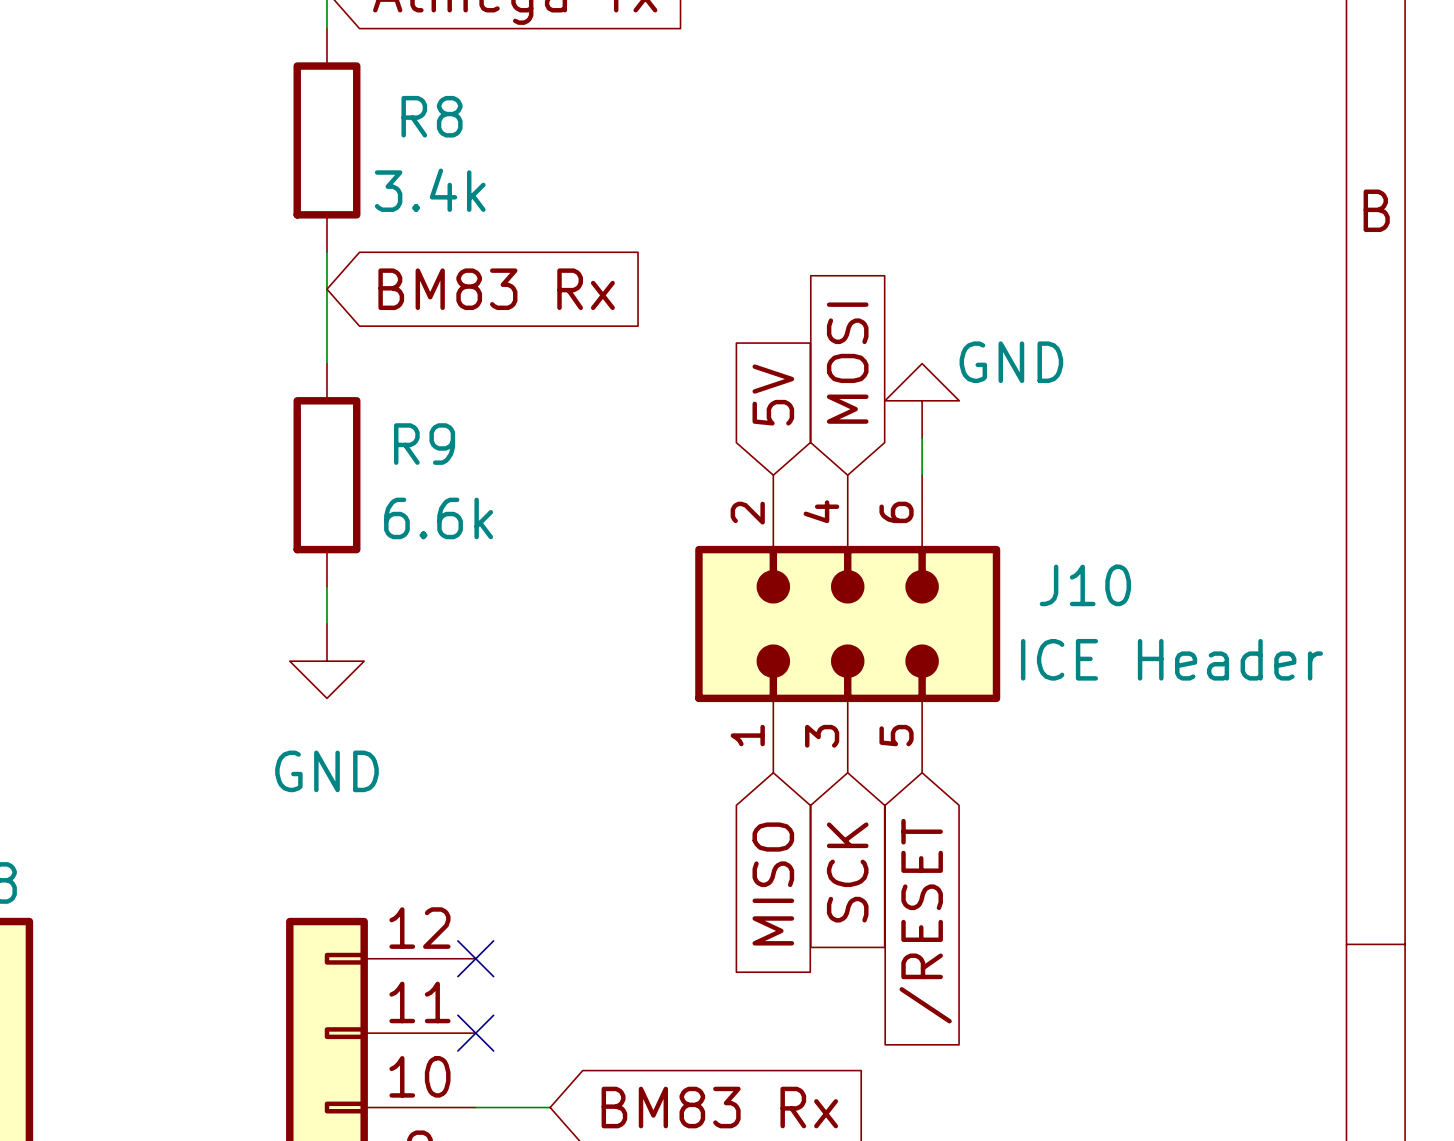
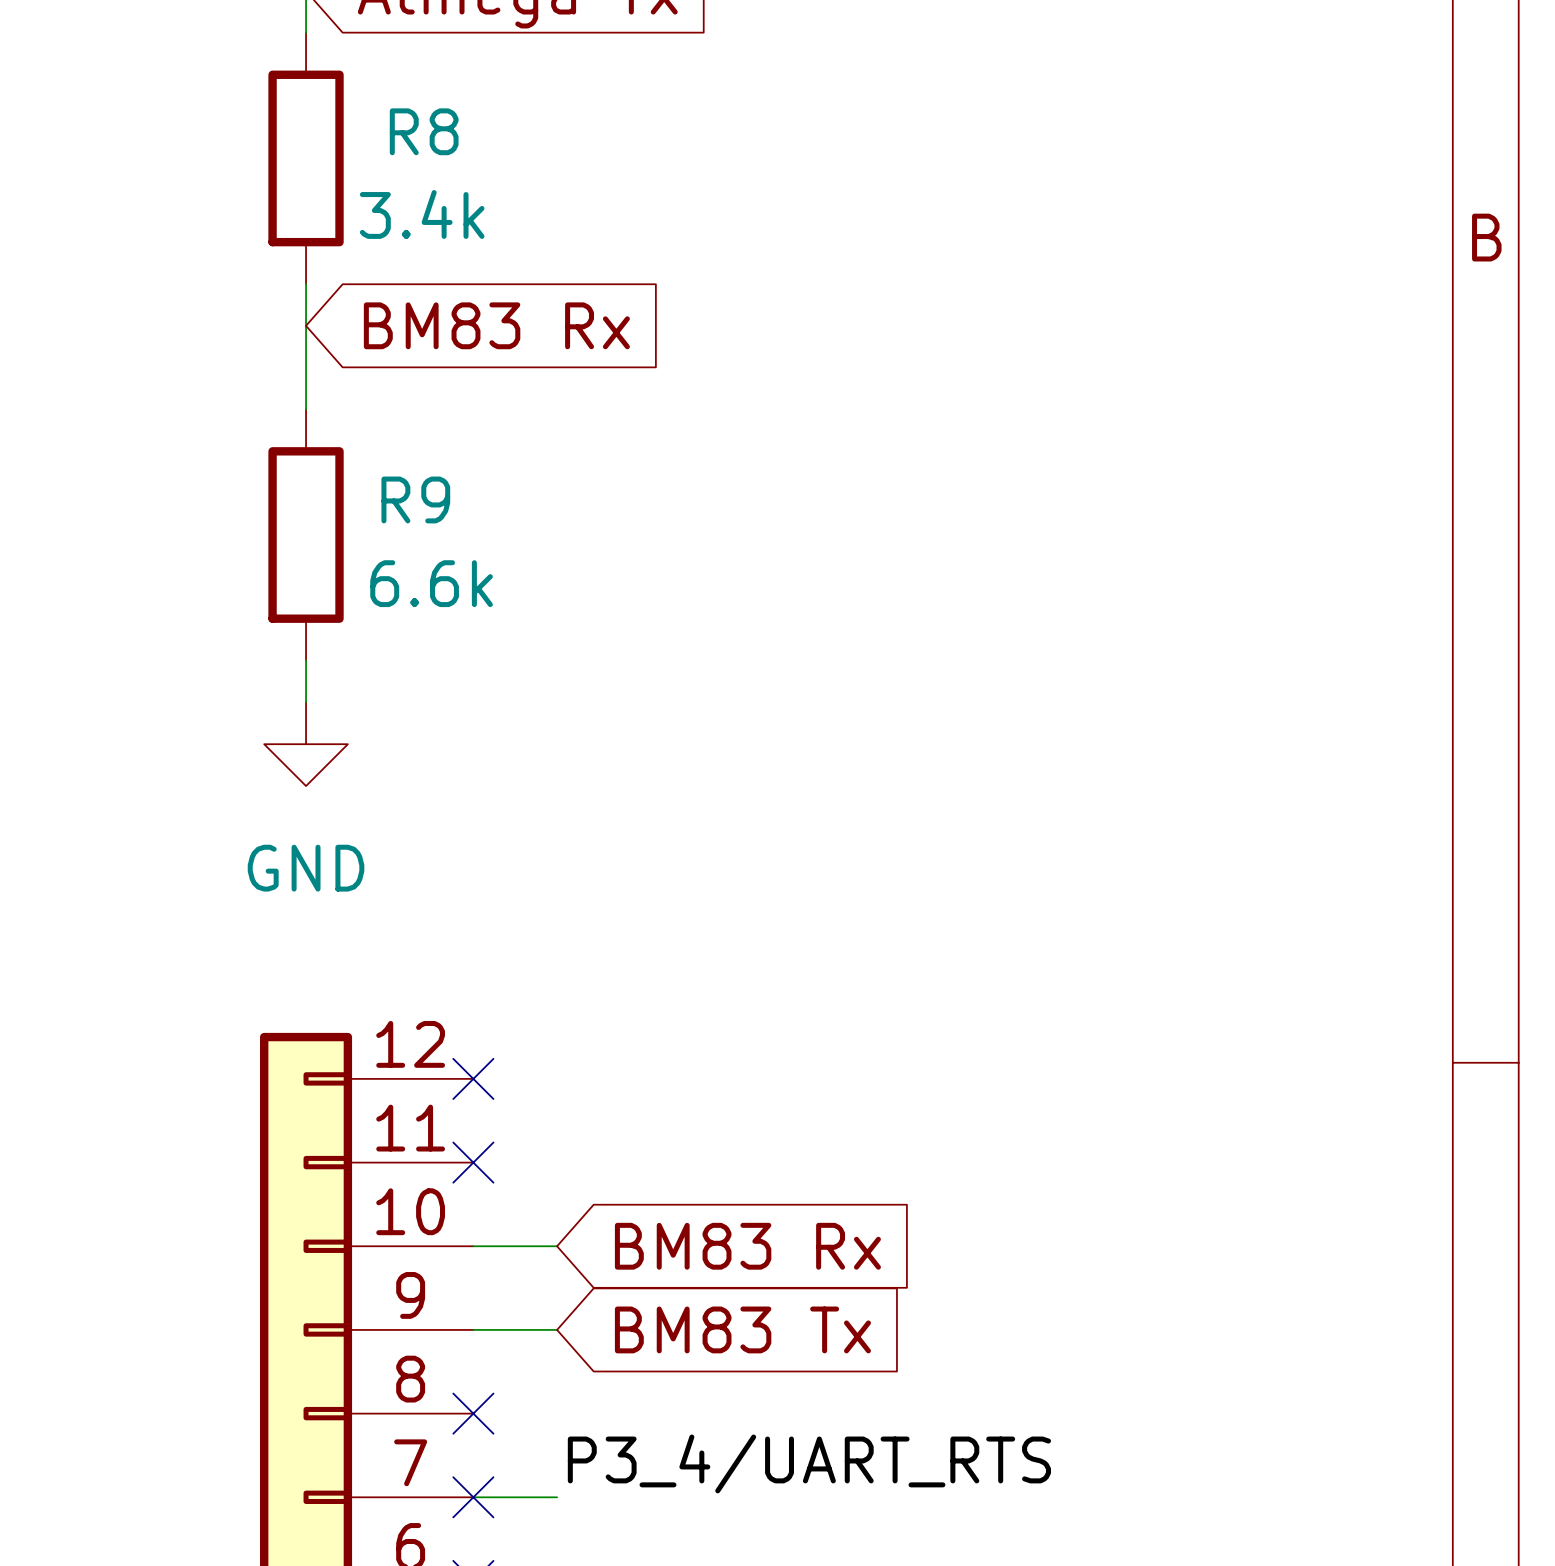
global label: MOSI (847, 363) -> none
global label: 5V (773, 394) -> none
power symbol: GND (922, 400) -> none
wire: (922, 438) (922, 475) -> none
J10: ICE Header (847, 623) -> none
global label: SCK (847, 872) -> none
global label: MISO (773, 883) -> none
global label: /RESET (925, 921) -> none

